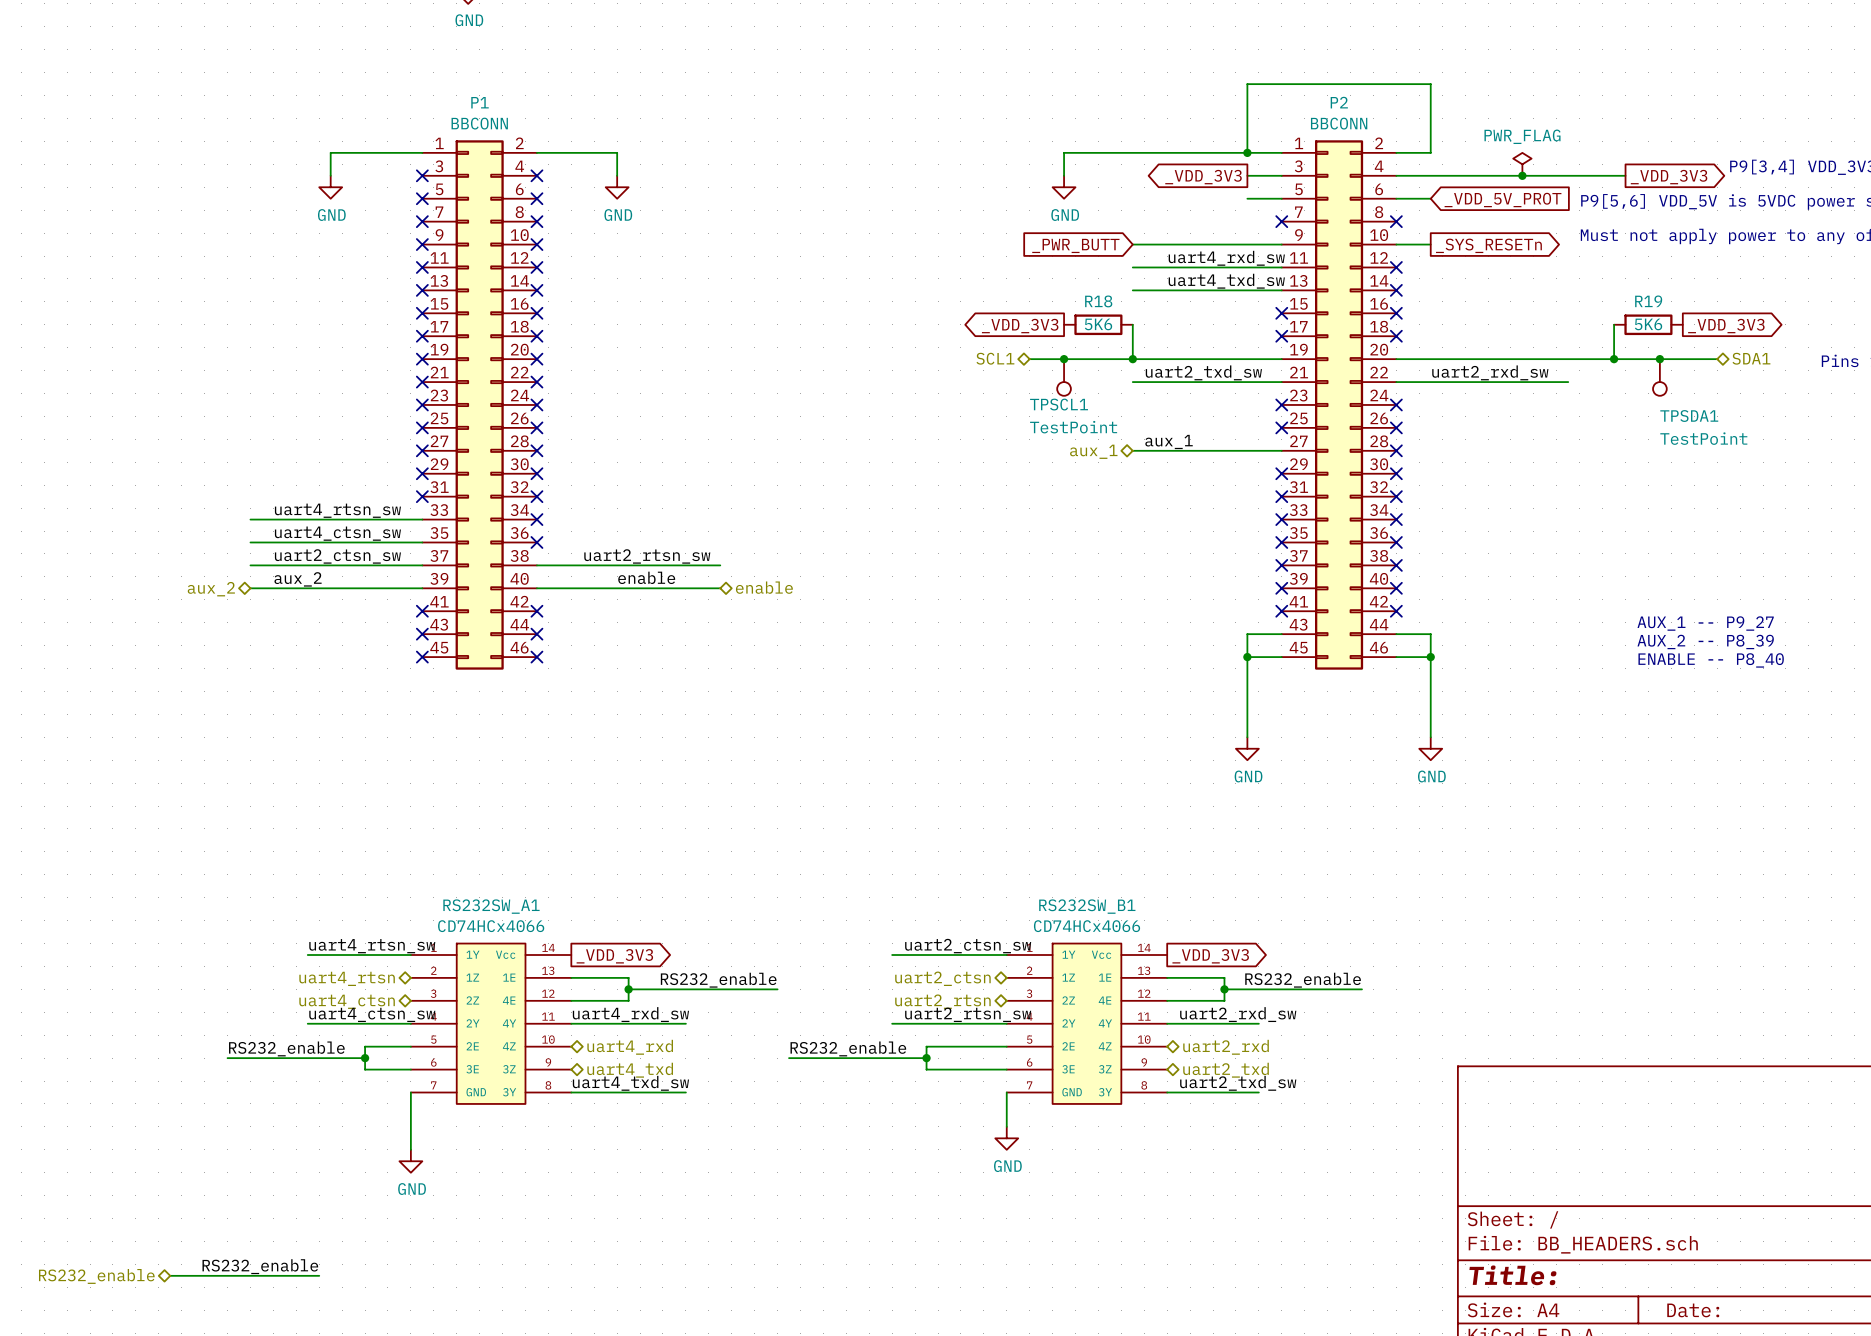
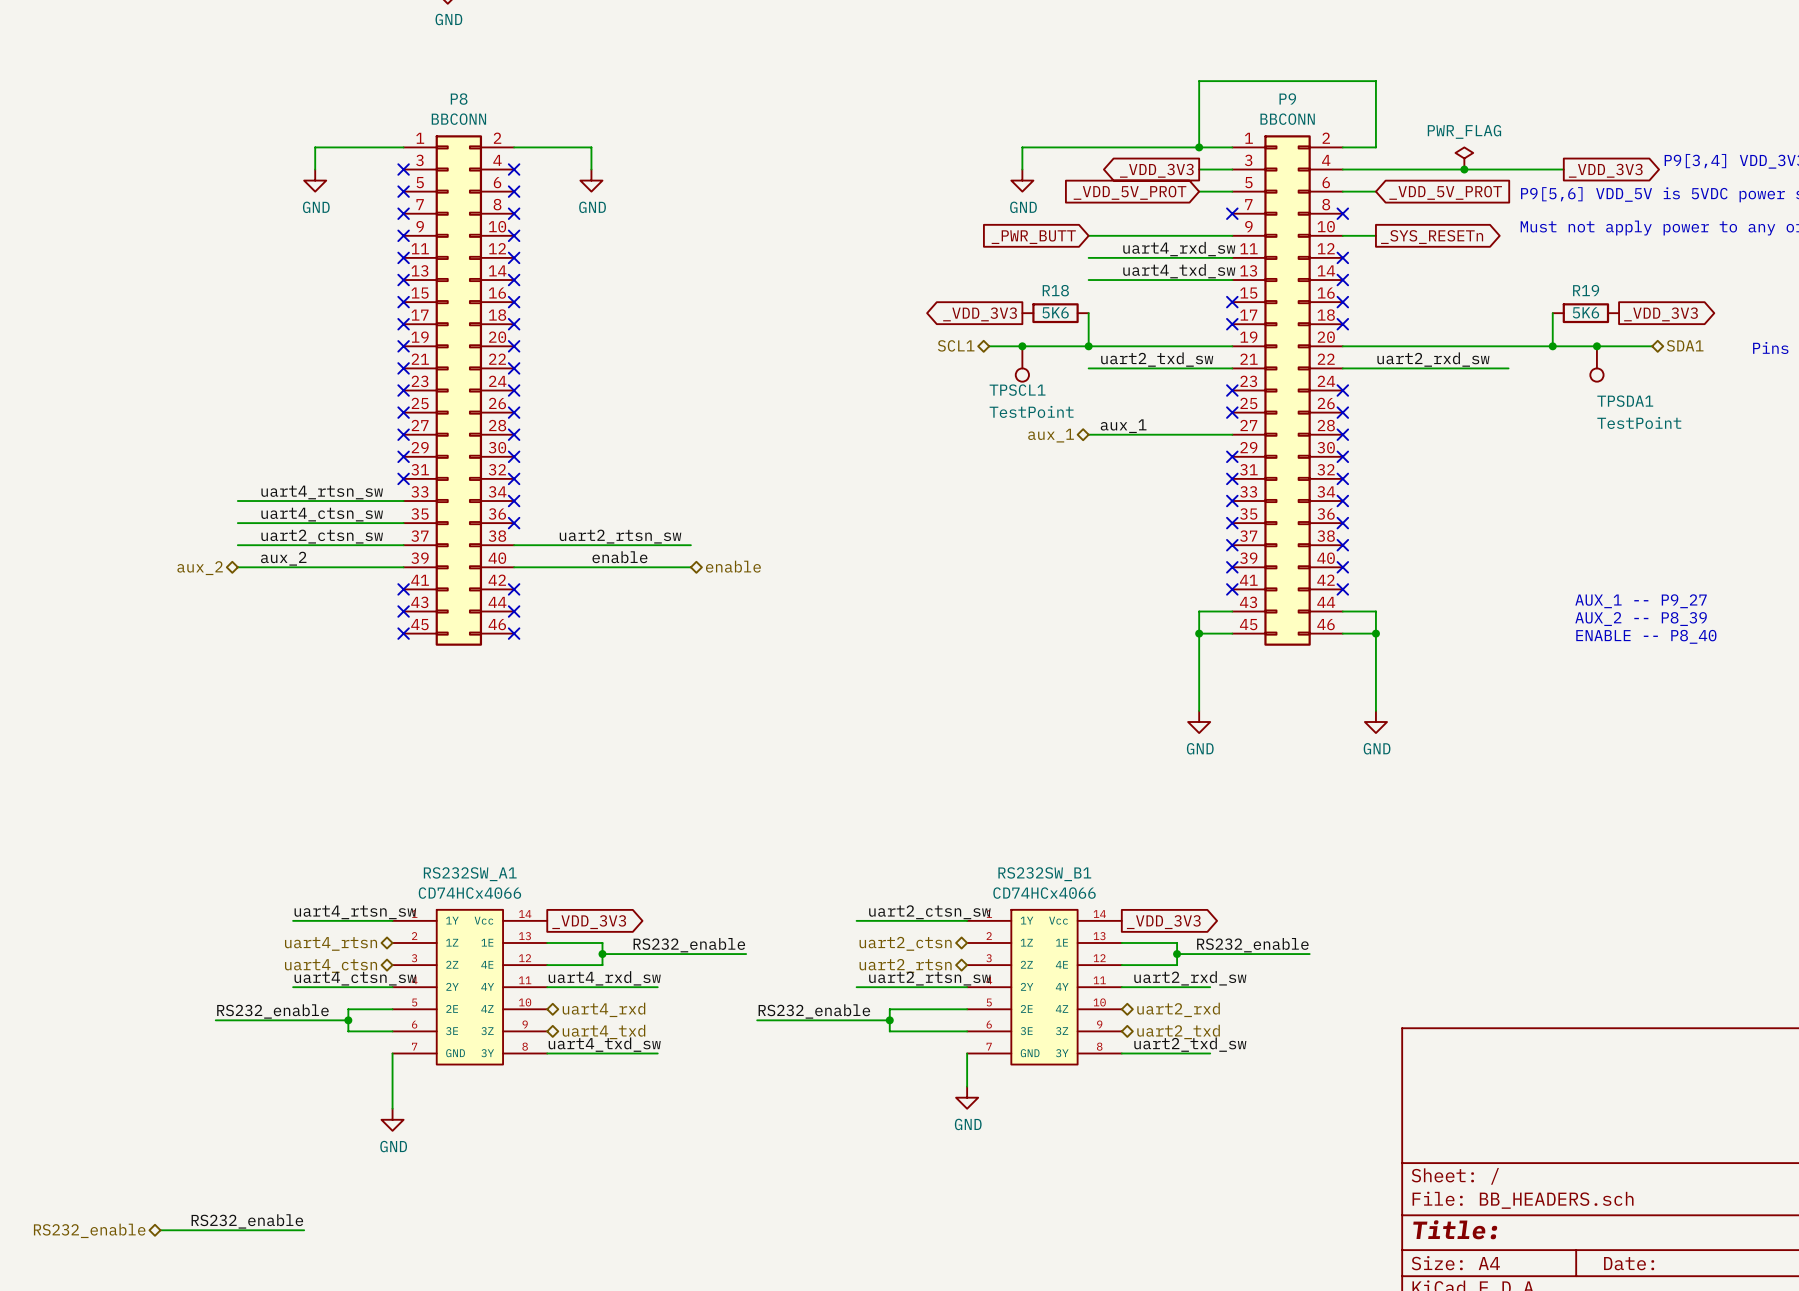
P1 name: P1 (480, 102) -> P8 (459, 99)
P2 name: P2 (1339, 102) -> P9 (1287, 98)
global label: none -> _VDD_5V_PROT (1130, 192)

